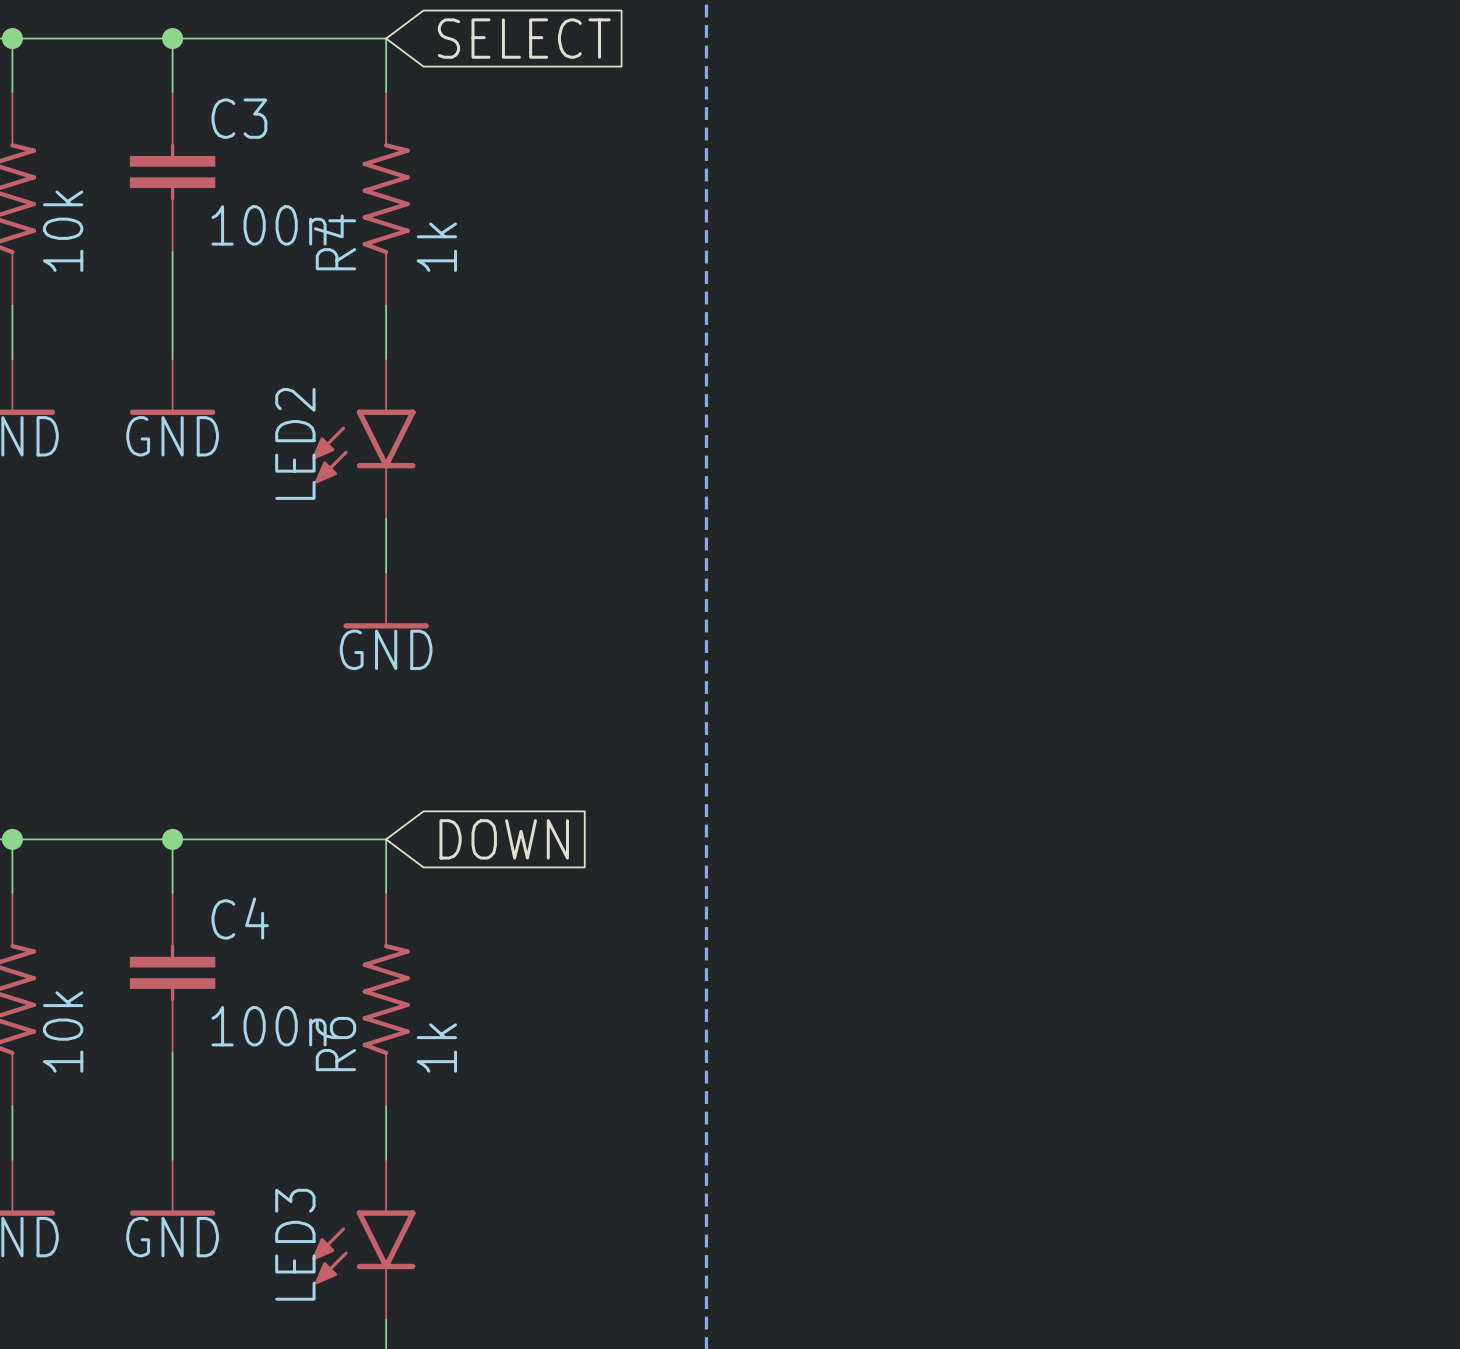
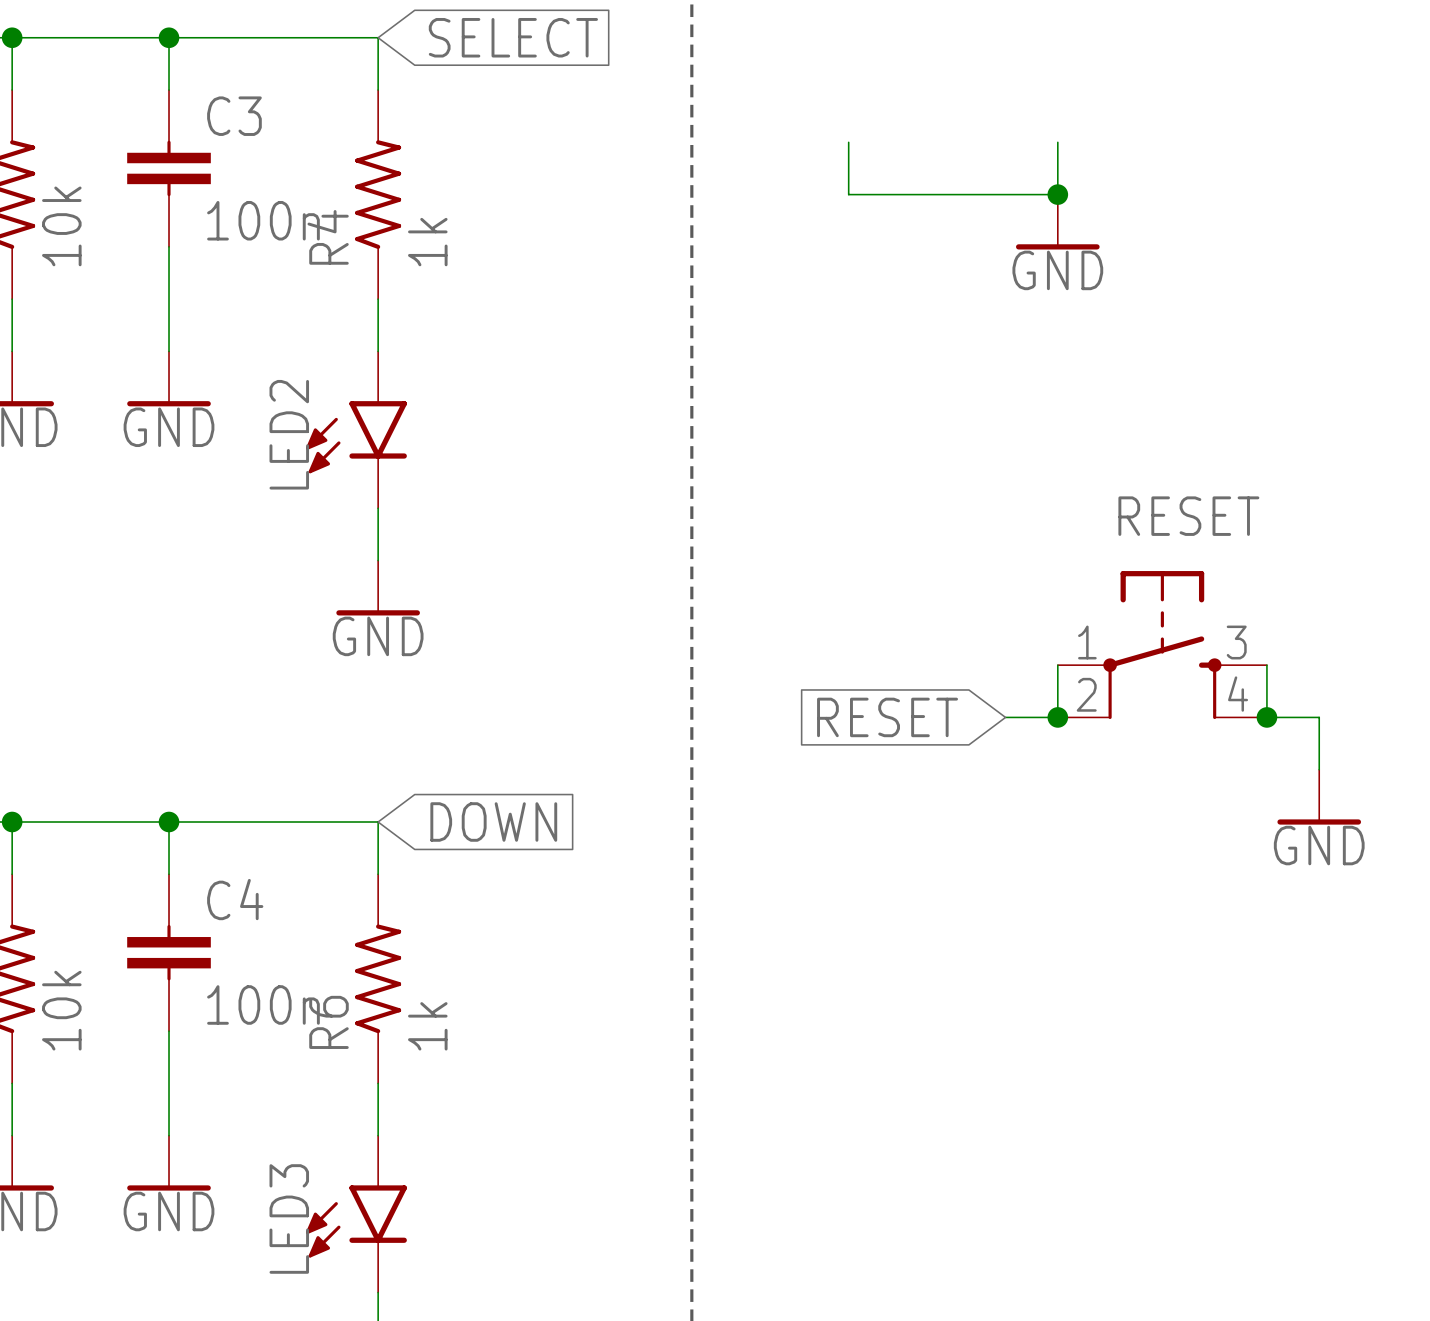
wire: none -> (848, 142) (848, 194) (1057, 194) (1057, 142)
junction: none -> (1057, 194)
power symbol: none -> GND (1057, 222)
RESET: none -> (1162, 645)
wire: none -> (1057, 665) (1057, 717) (1005, 717)
wire: none -> (1266, 665) (1266, 717) (1319, 717) (1319, 769)
global label: none -> RESET (887, 717)
junction: none -> (1057, 717)
junction: none -> (1266, 717)
power symbol: none -> GND (1319, 797)

